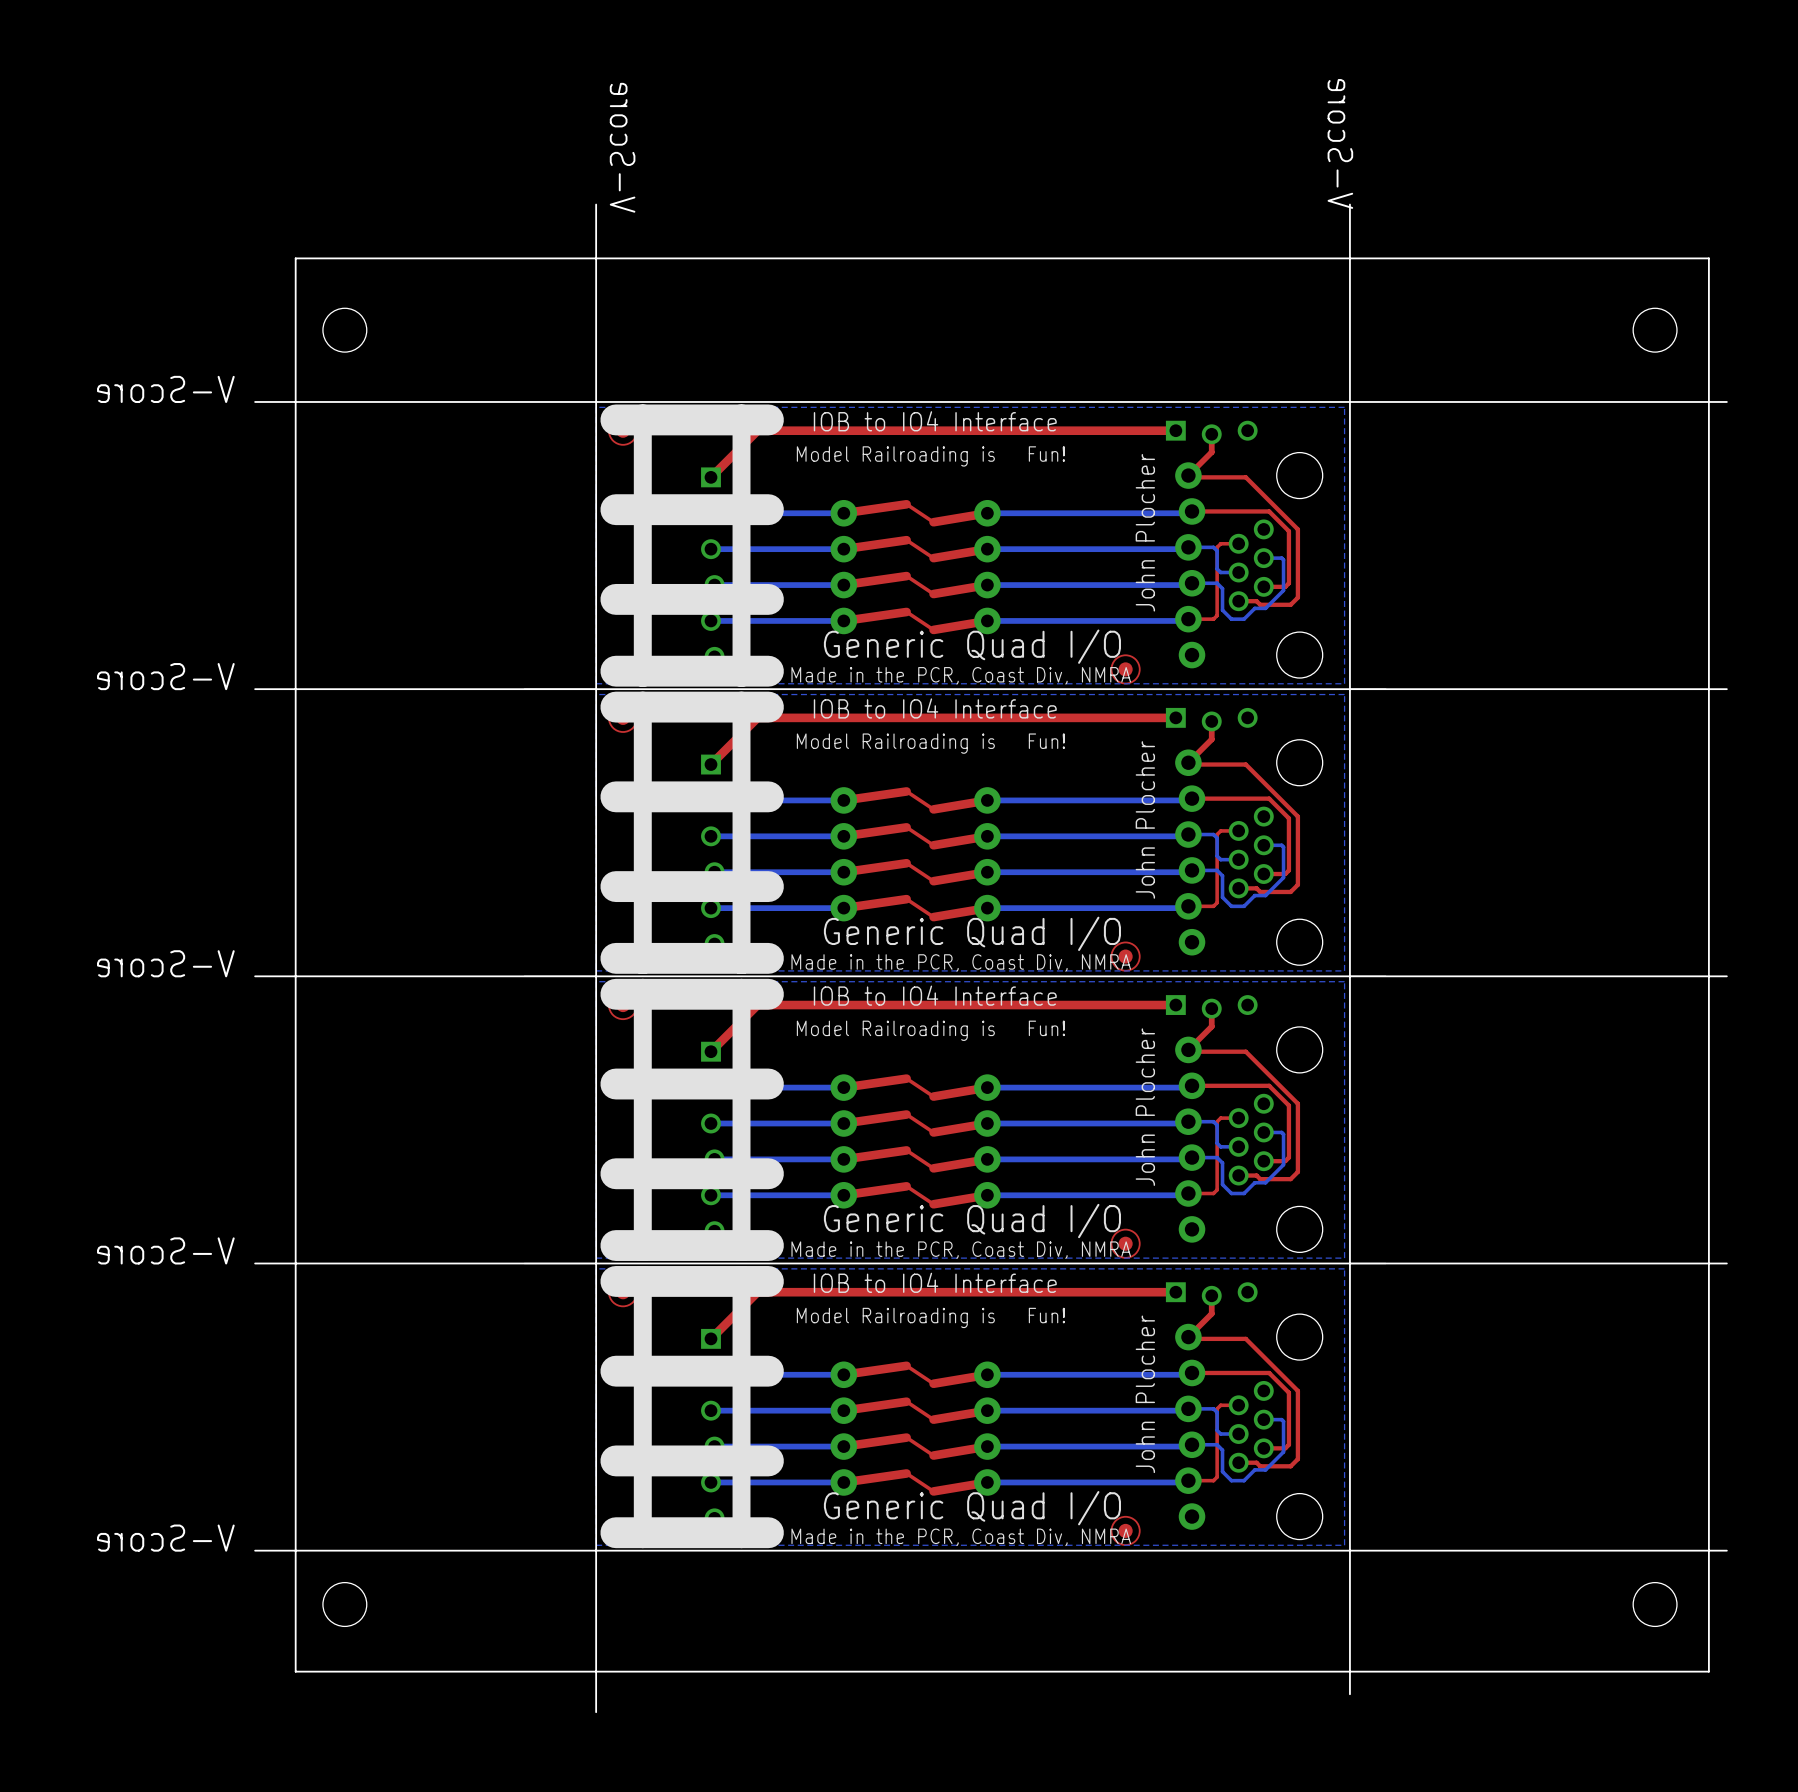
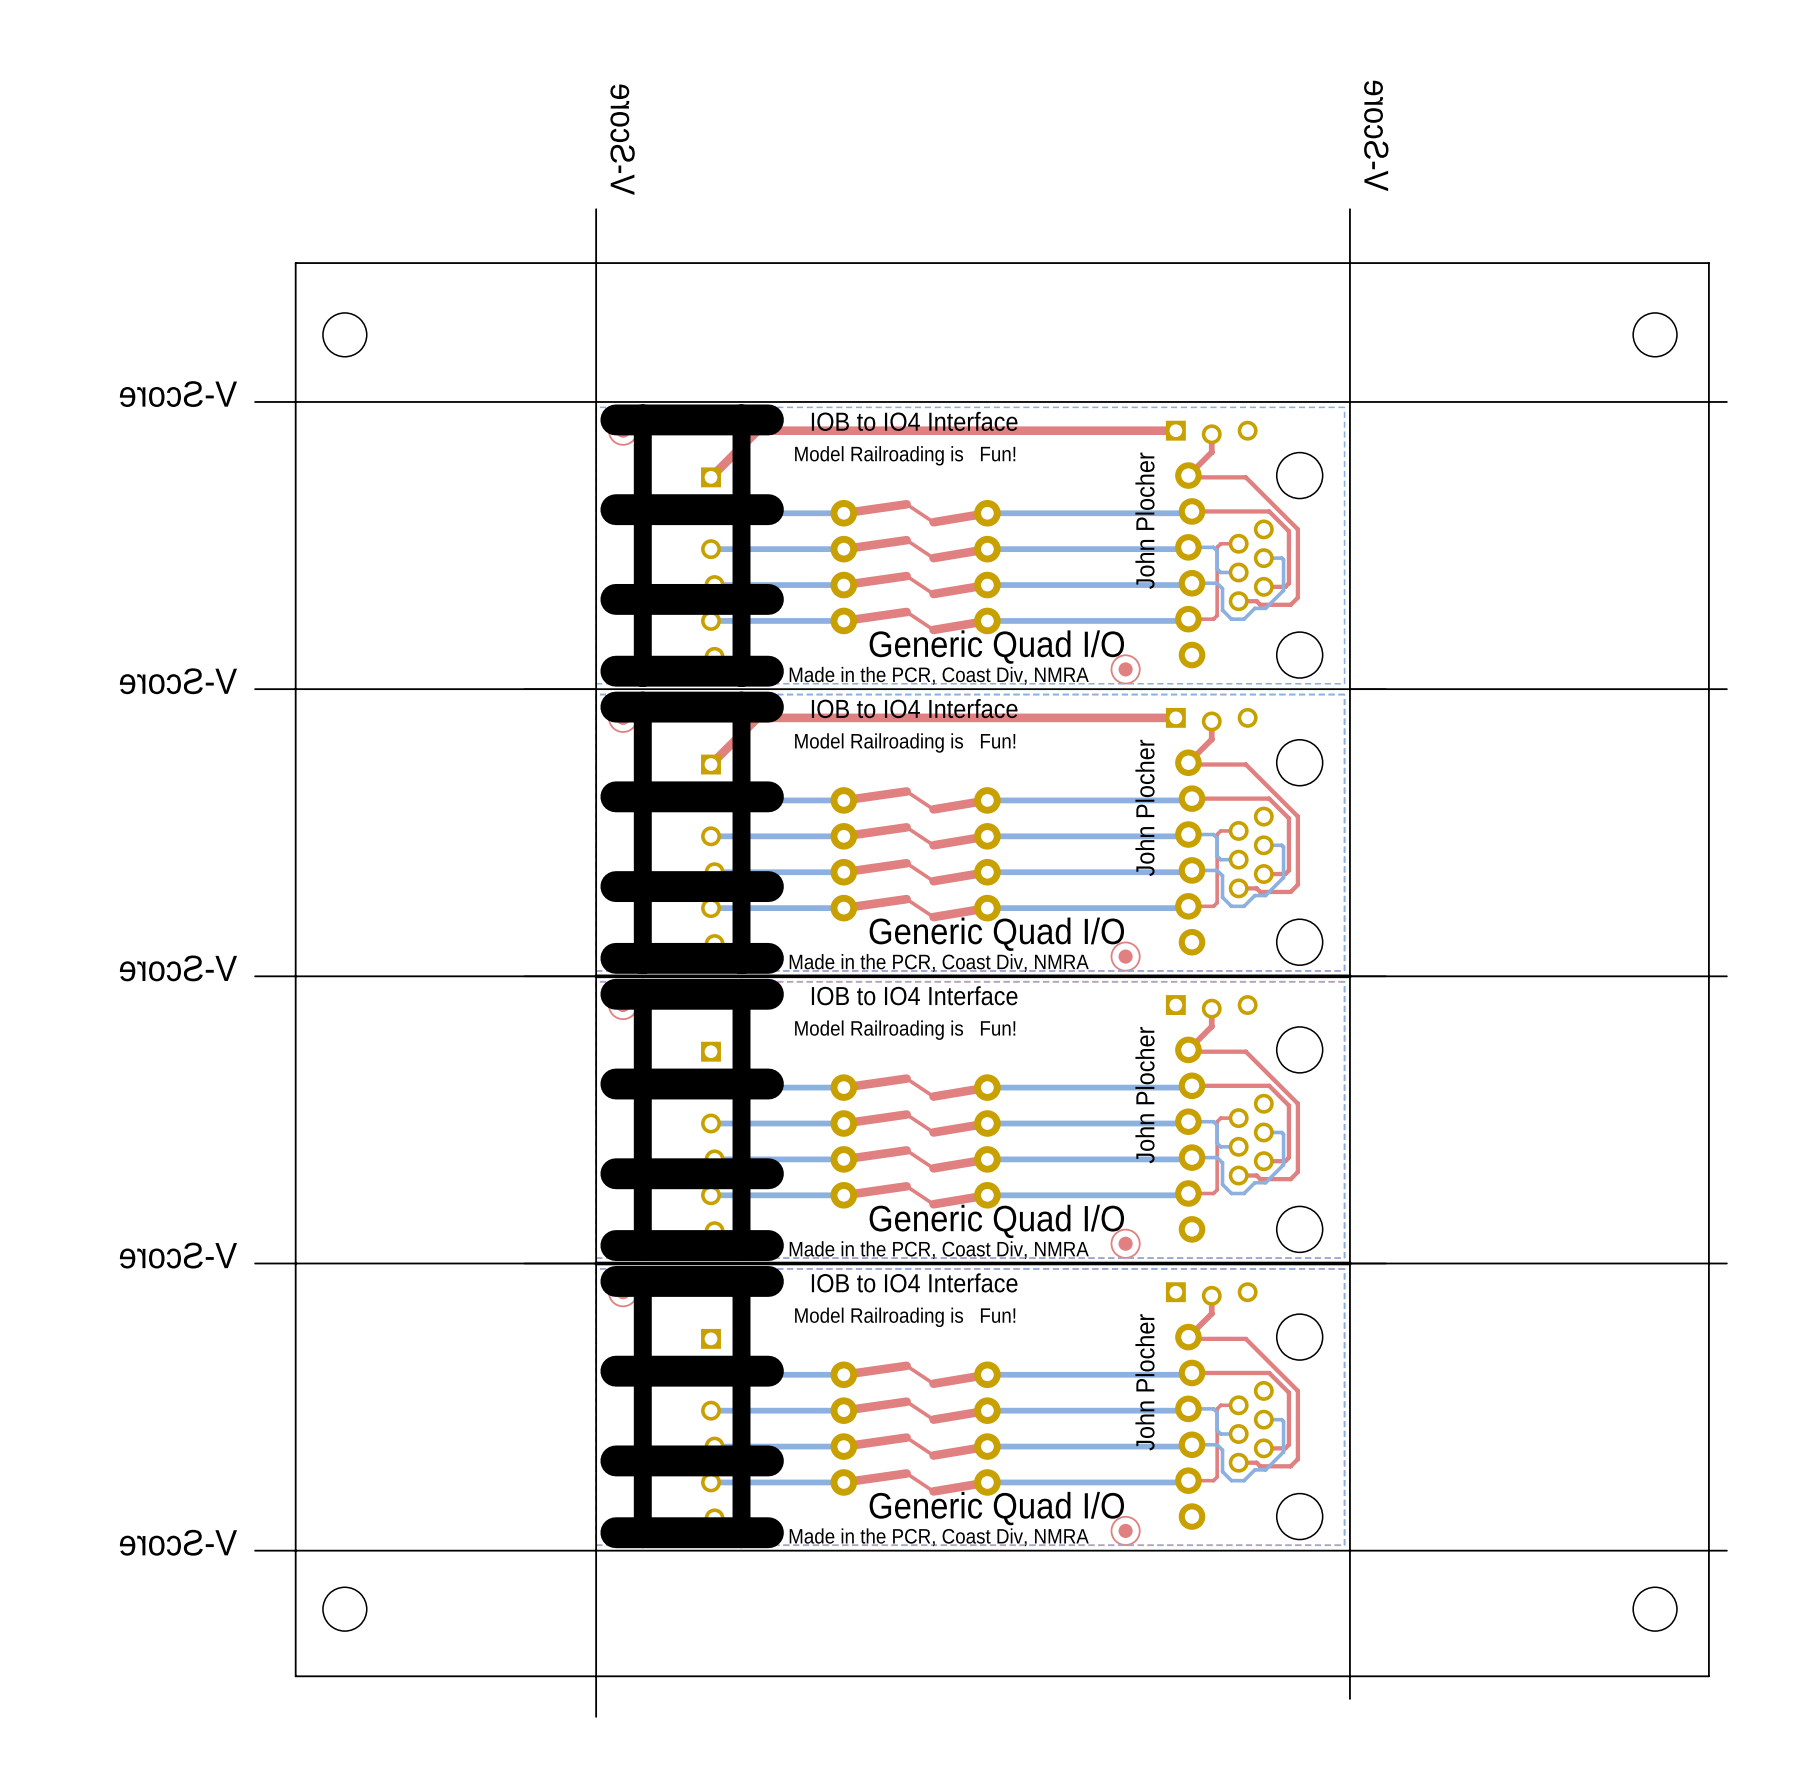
part footprint: [254, 203, 1728, 1714] -> [254, 208, 1728, 1718]
board edge: none -> (1349, 976) (596, 976)
top track: (1175, 1005) (757, 1005) (711, 1051) -> none
board edge: none -> (1349, 1263) (596, 1263)
top track: (1175, 1292) (757, 1292) (711, 1338) -> none

